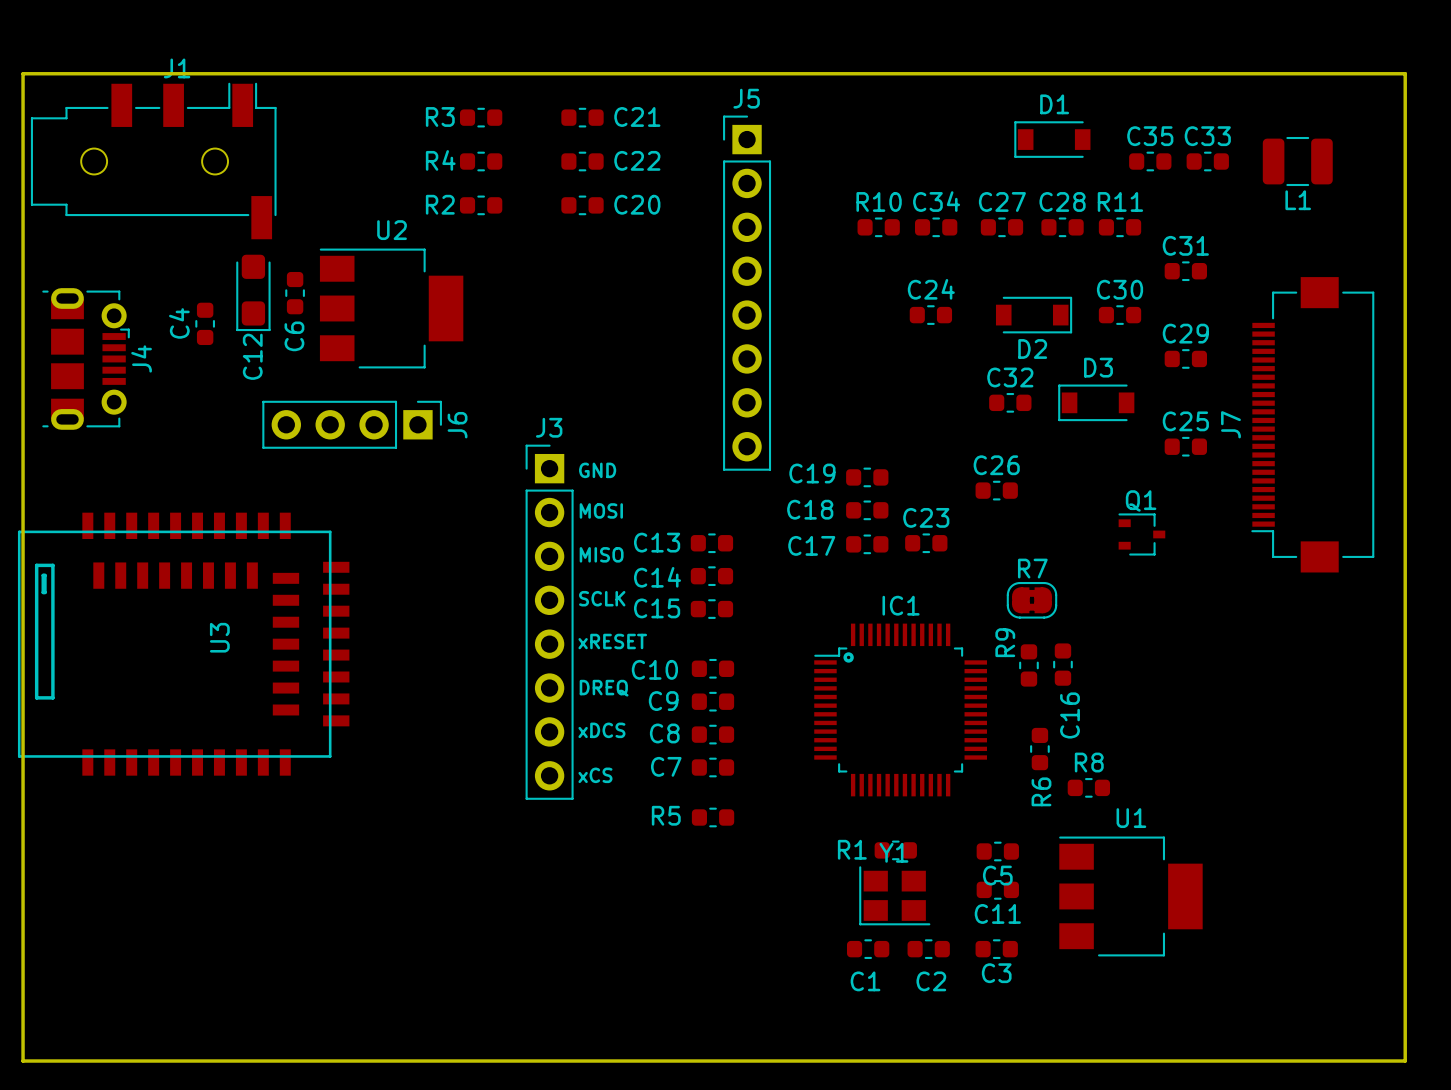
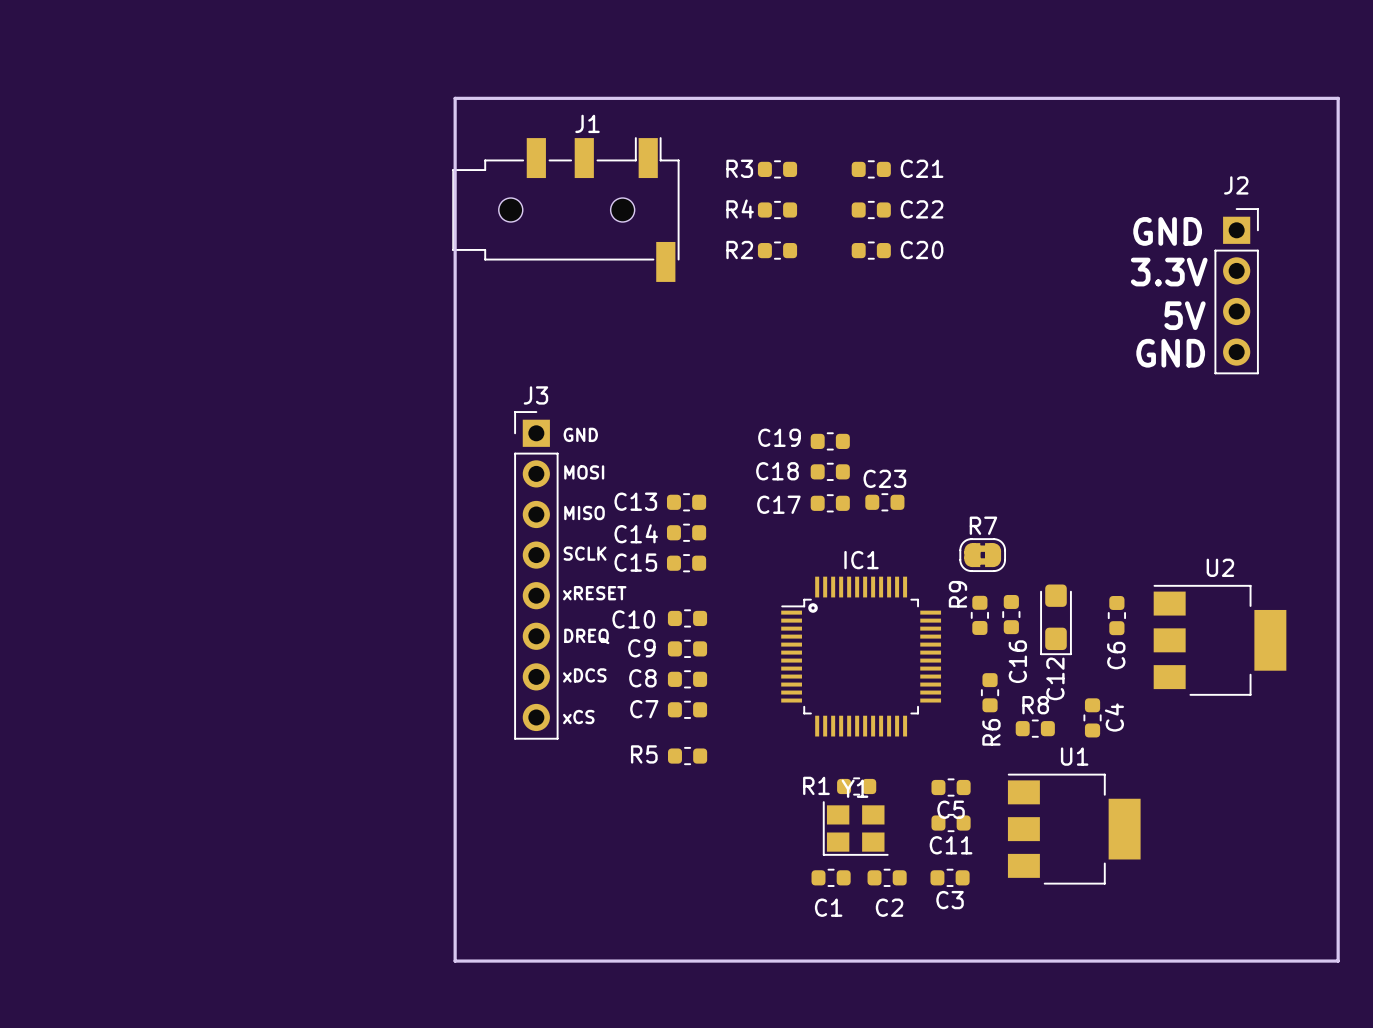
board edge: (23, 73) (23, 1061) (1405, 1061) (1405, 73) (23, 73) -> (455, 98) (455, 961) (1338, 961) (1338, 98) (455, 98)
R3 position: (481, 117) -> (777, 169)
C21 position: (582, 117) -> (871, 169)
D1: (1052, 139) -> none
J1 position: (153, 160) -> (565, 209)
R4 position: (481, 161) -> (777, 210)
C22 position: (582, 161) -> (871, 210)
C35: (1150, 161) -> none
C33: (1207, 161) -> none
L1: (1297, 161) -> none
R2 position: (481, 205) -> (777, 250)
C20 position: (582, 205) -> (871, 250)
R10: (878, 227) -> none
C34: (936, 227) -> none
C27: (1001, 227) -> none
C28: (1062, 227) -> none
R11: (1120, 227) -> none
text: none -> GND (1167, 231)
C31: (1185, 271) -> none
C12 position: (253, 292) -> (1056, 619)
C6 position: (295, 293) -> (1116, 615)
J5: (747, 293) -> none
text: none -> 3.3V (1169, 272)
U2 position: (391, 308) -> (1219, 640)
C24: (930, 315) -> none
D2: (1034, 315) -> none
C30: (1120, 315) -> none
J2: none -> (1236, 291)
C4 name position: C4 (179, 323) -> C4 (1114, 717)
C4 position: (205, 323) -> (1092, 717)
text: none -> 5V (1185, 315)
J4: (86, 358) -> none
C29: (1185, 358) -> none
text: none -> GND (1170, 353)
C32: (1010, 402) -> none
D3: (1096, 402) -> none
J6: (352, 424) -> none
J7: (1312, 424) -> none
C25: (1185, 446) -> none
C26: (996, 490) -> none
Q1: (1141, 534) -> none
U3: (183, 644) -> none

